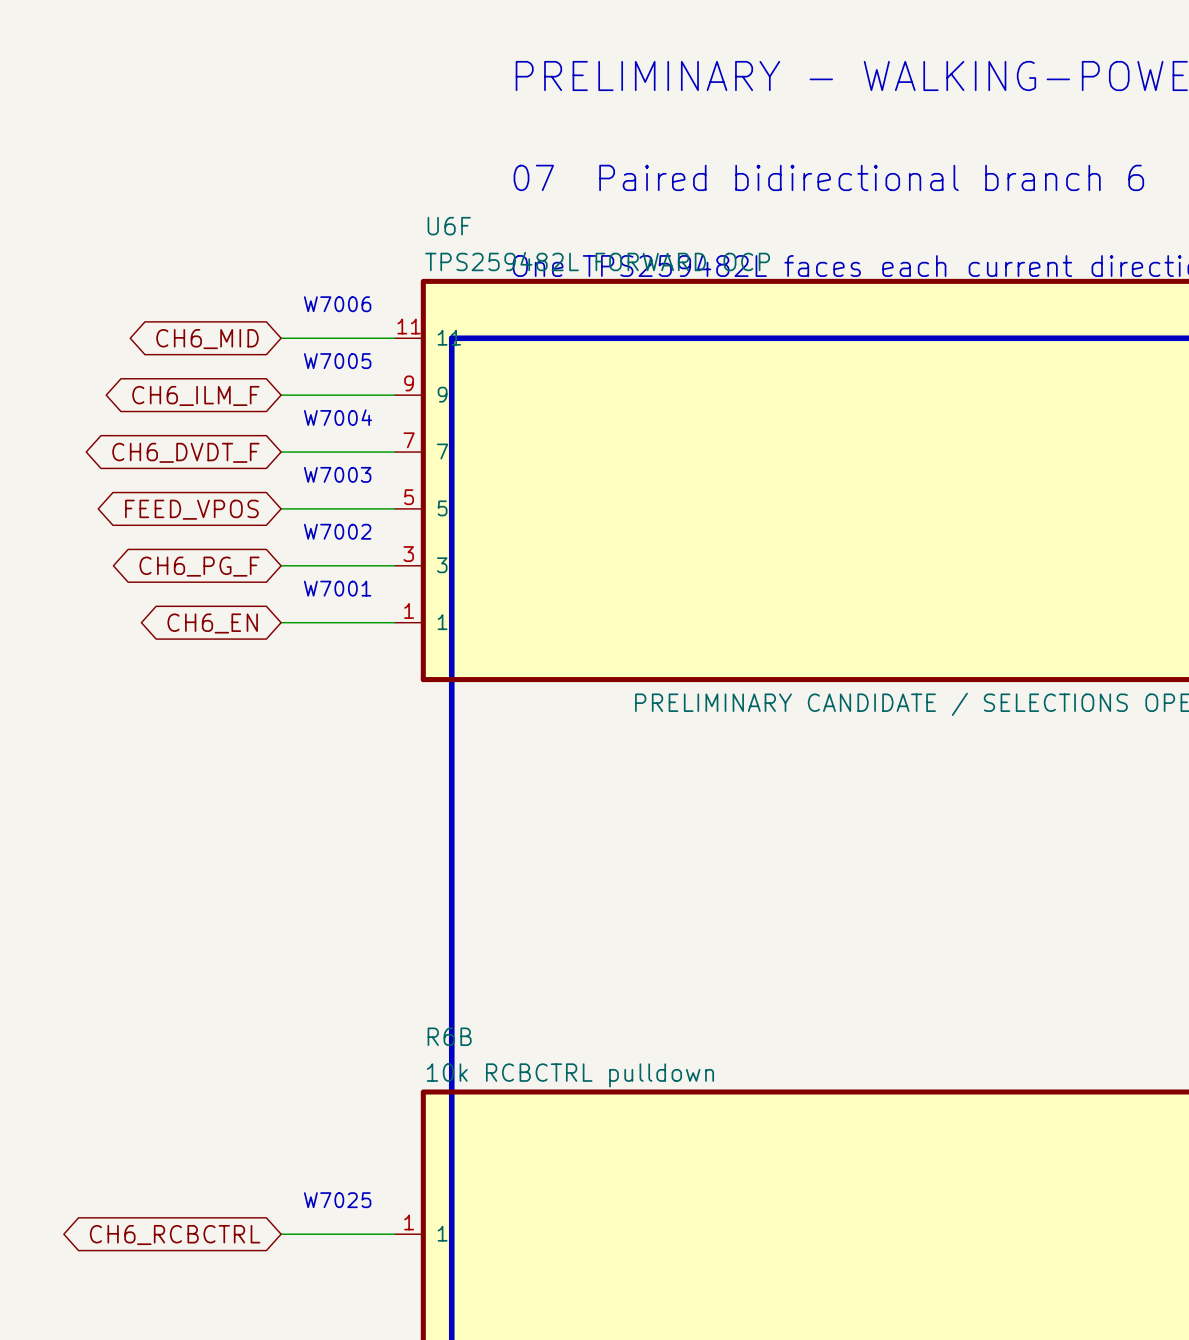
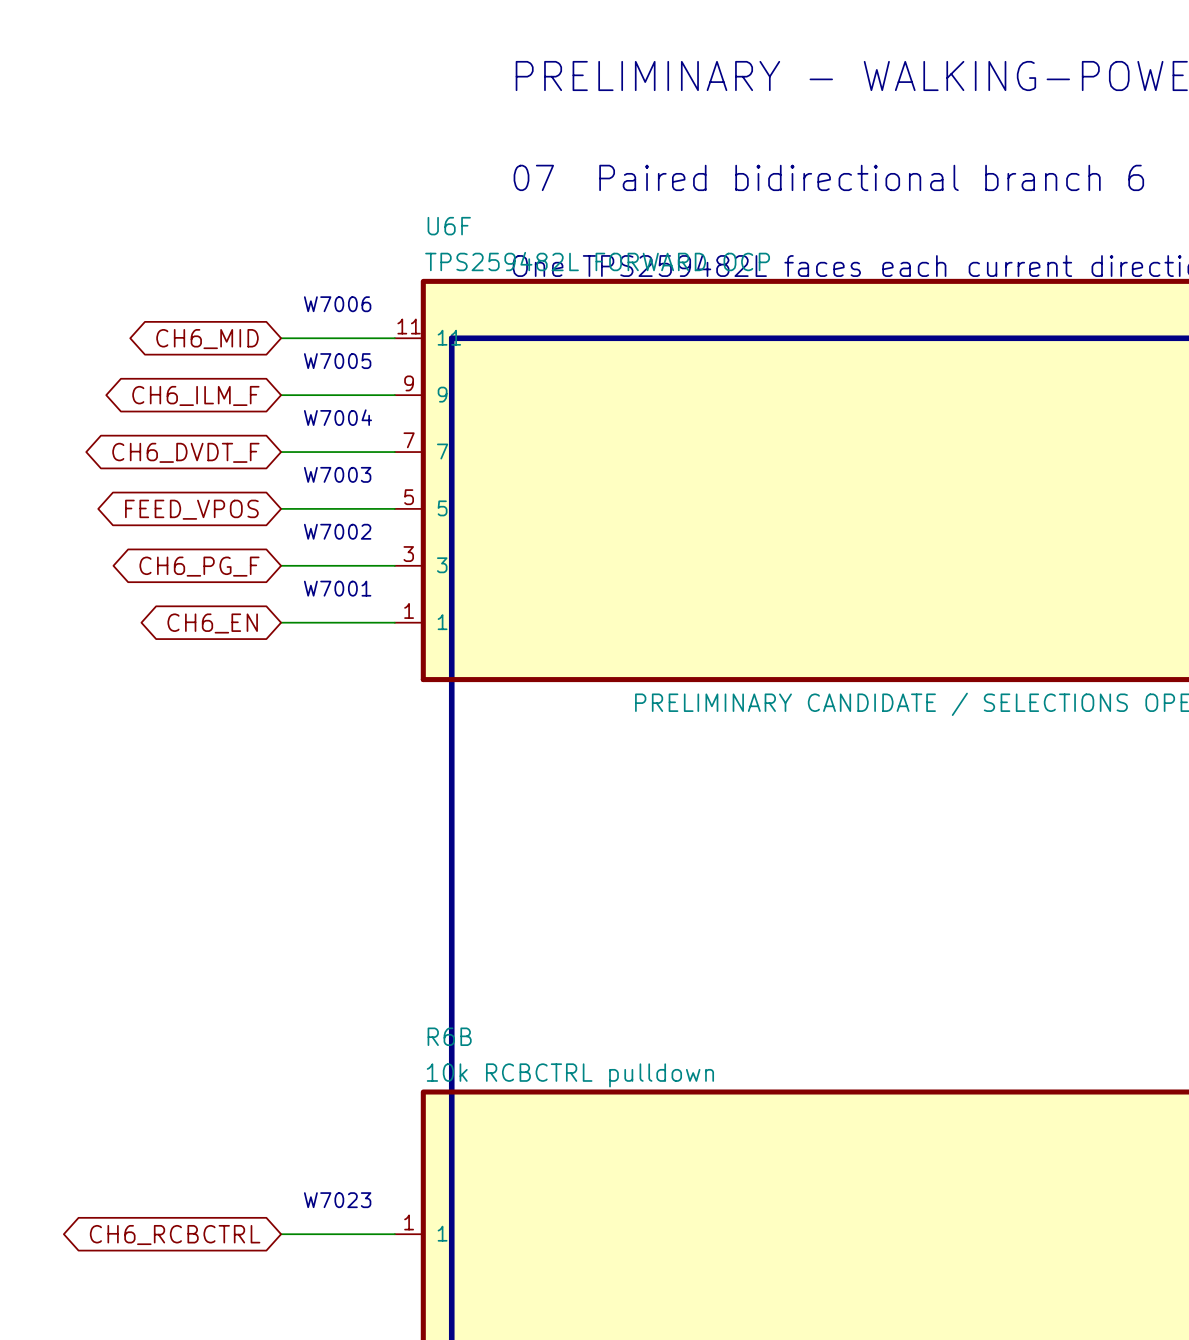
text: W7025 (337, 1200) -> W7023 (337, 1200)

